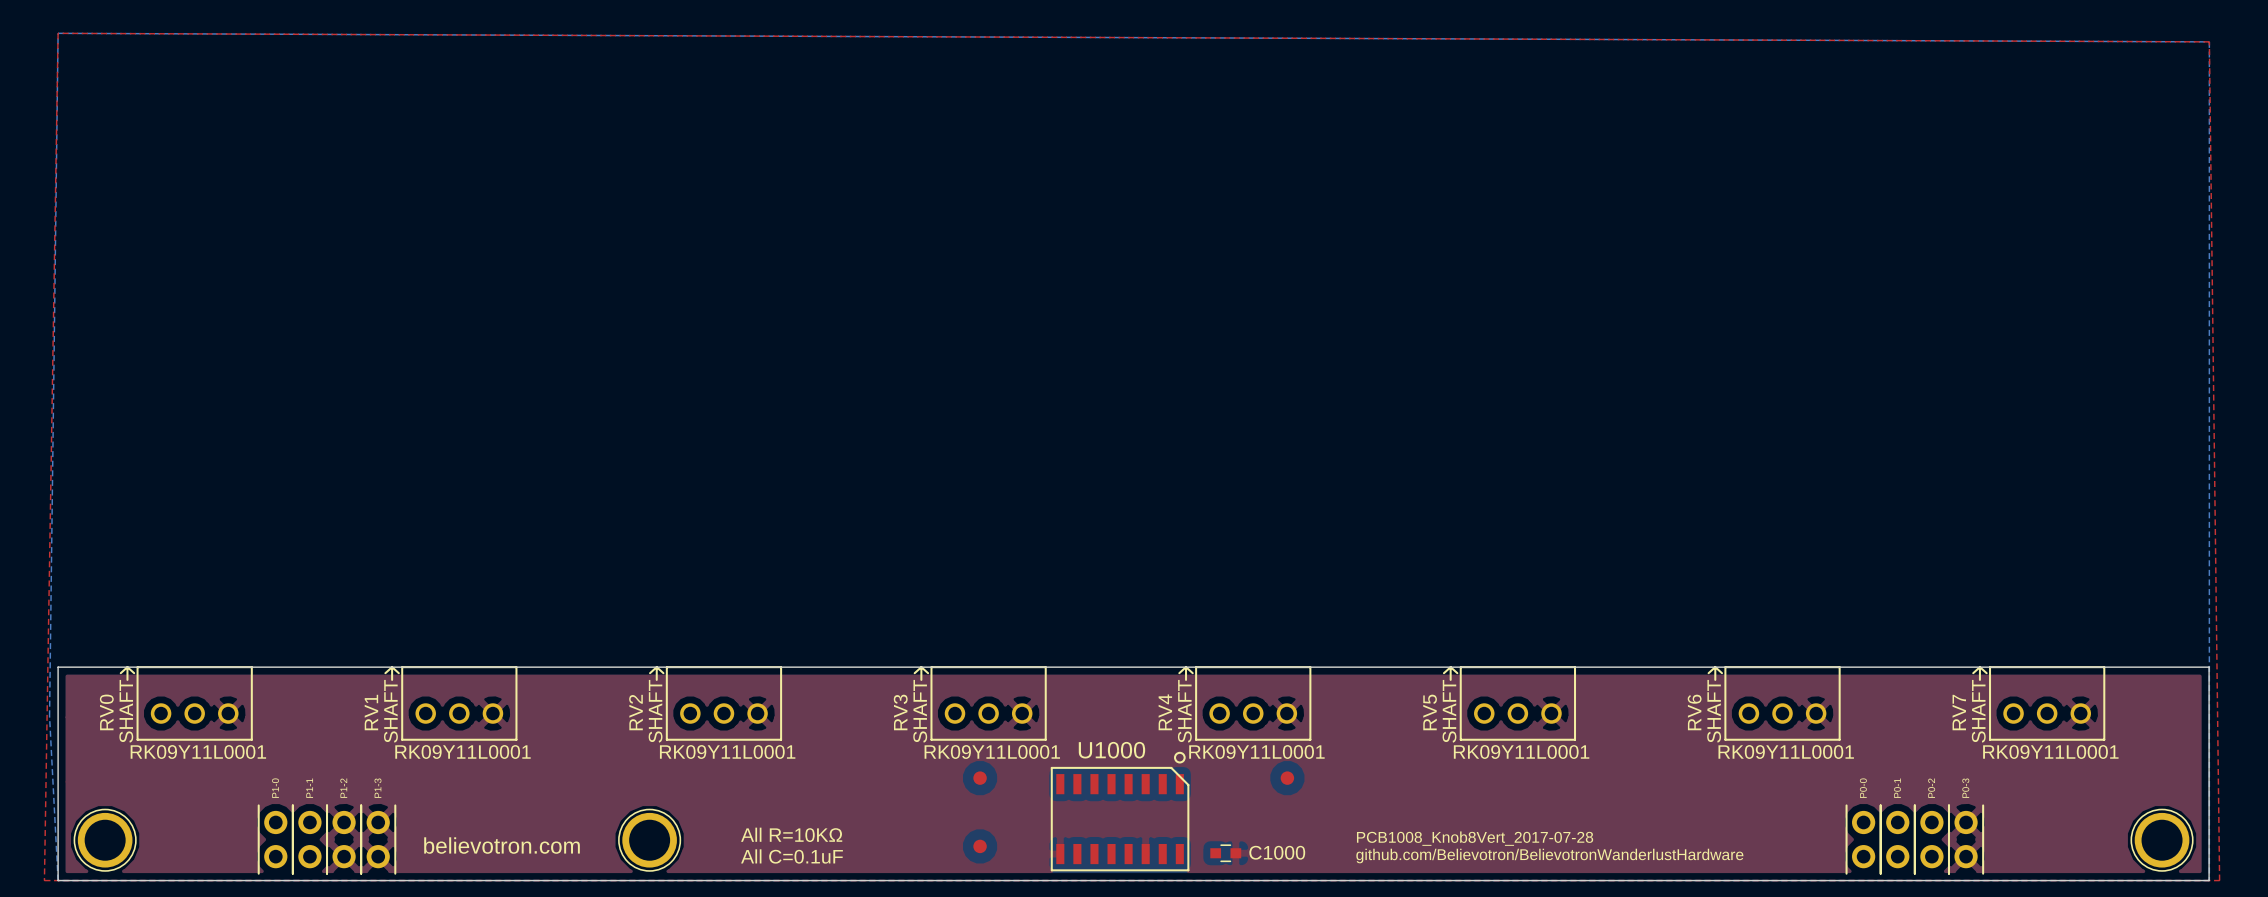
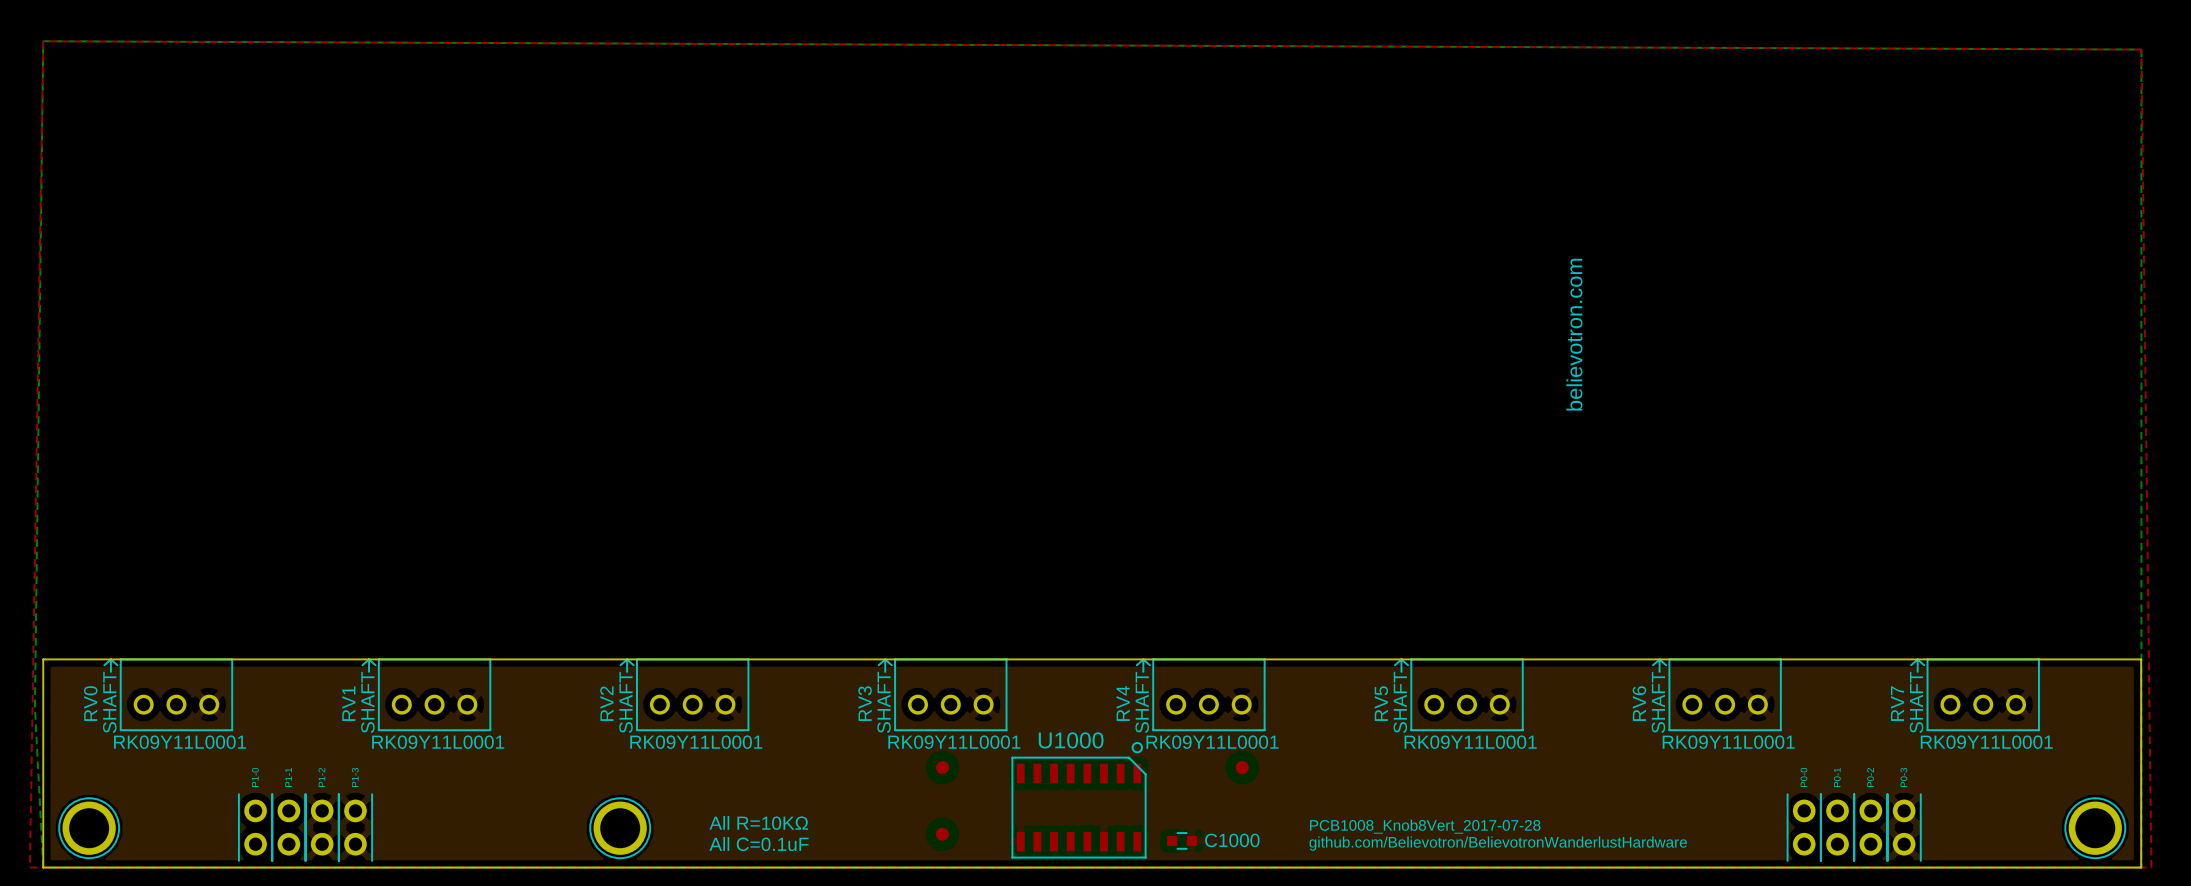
text: none -> believotron.com (1574, 334)
text: believotron.com (501, 845) -> none

